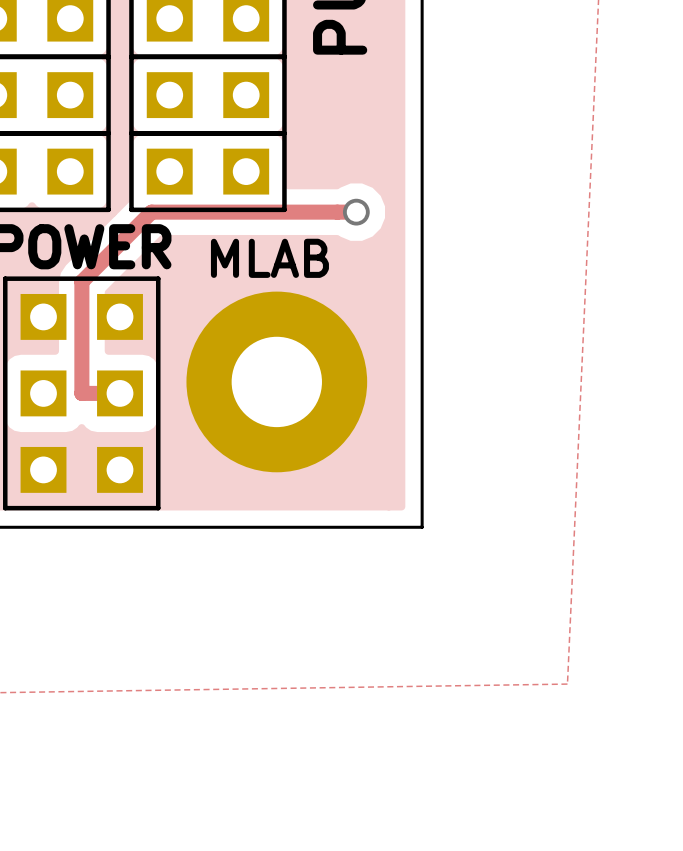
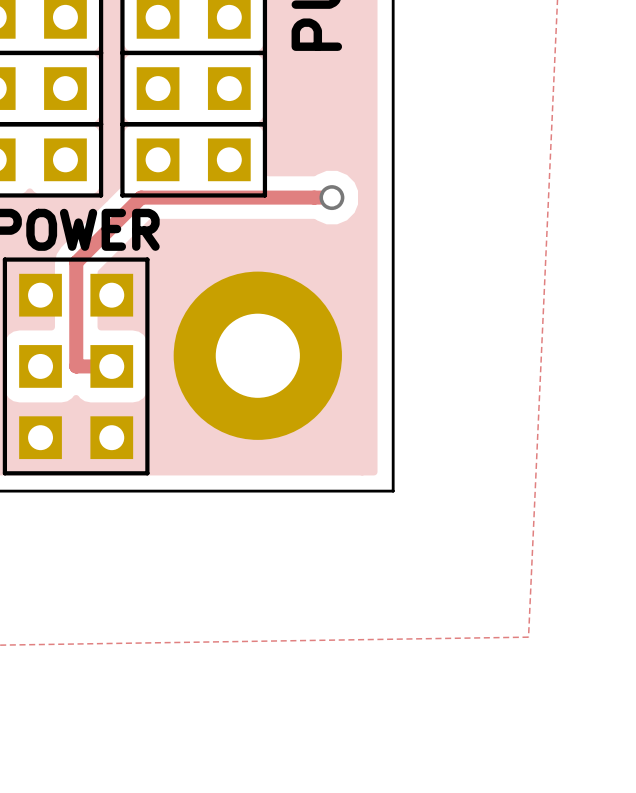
text: MLAB (269, 258) -> none

